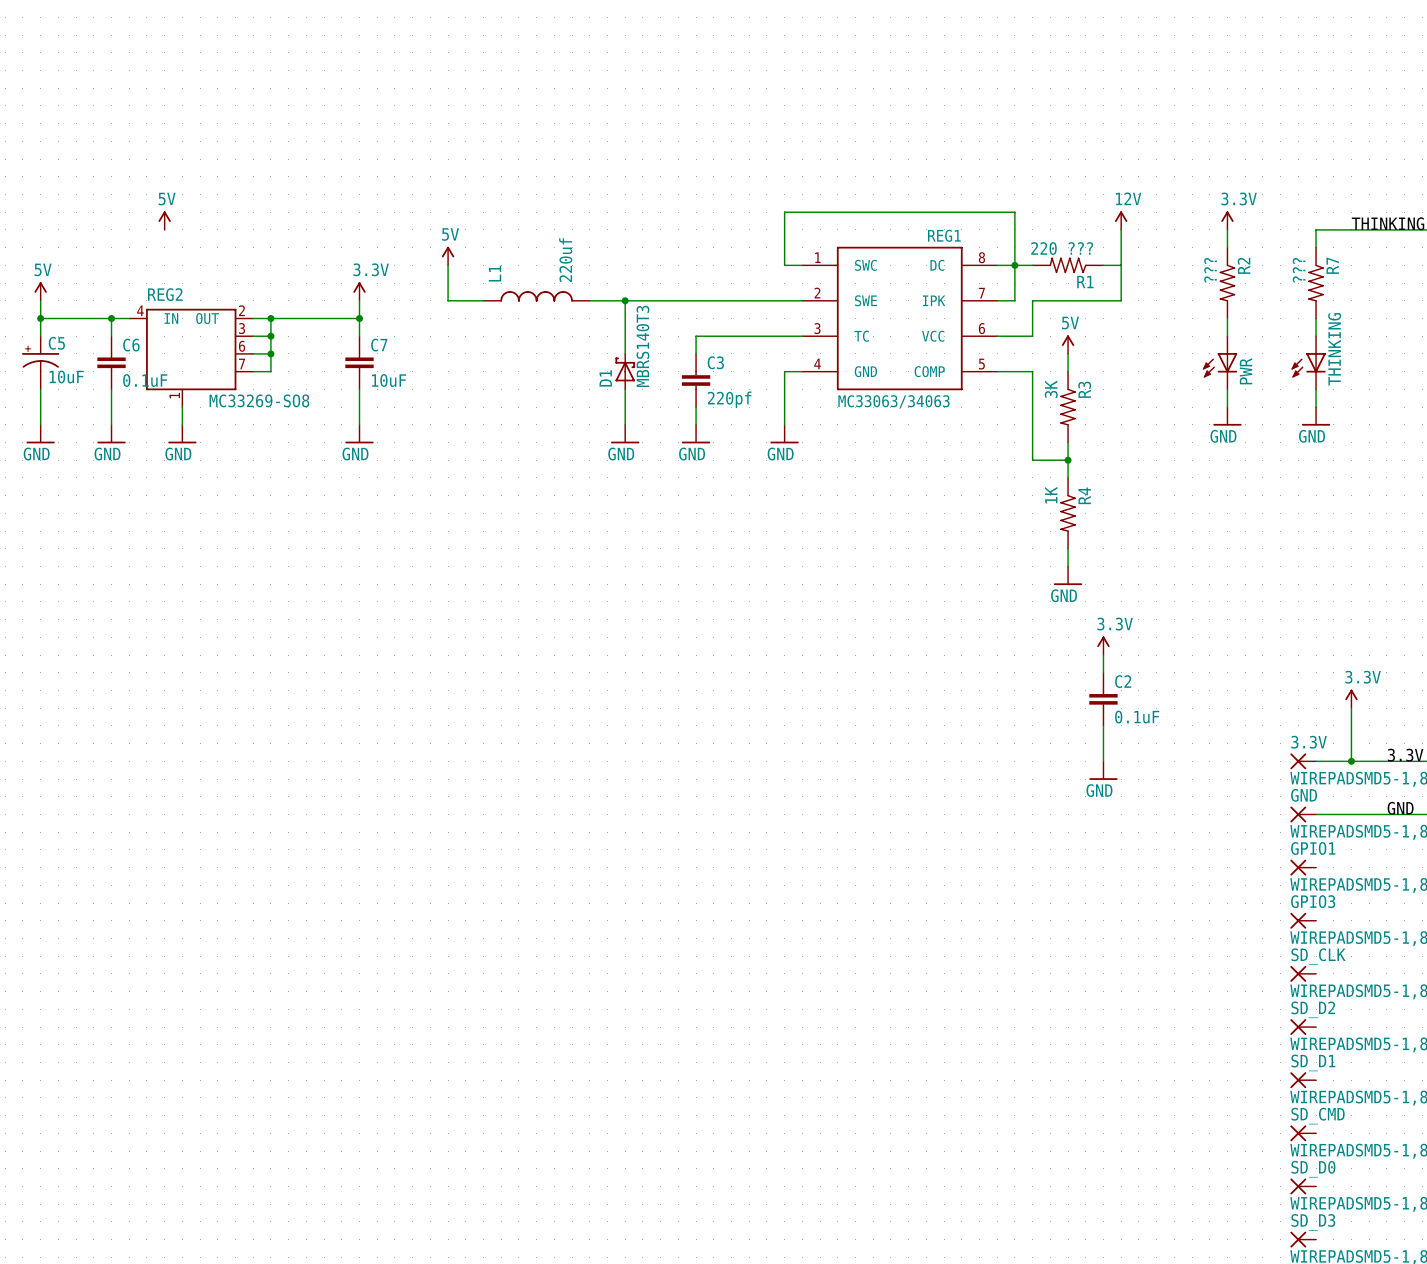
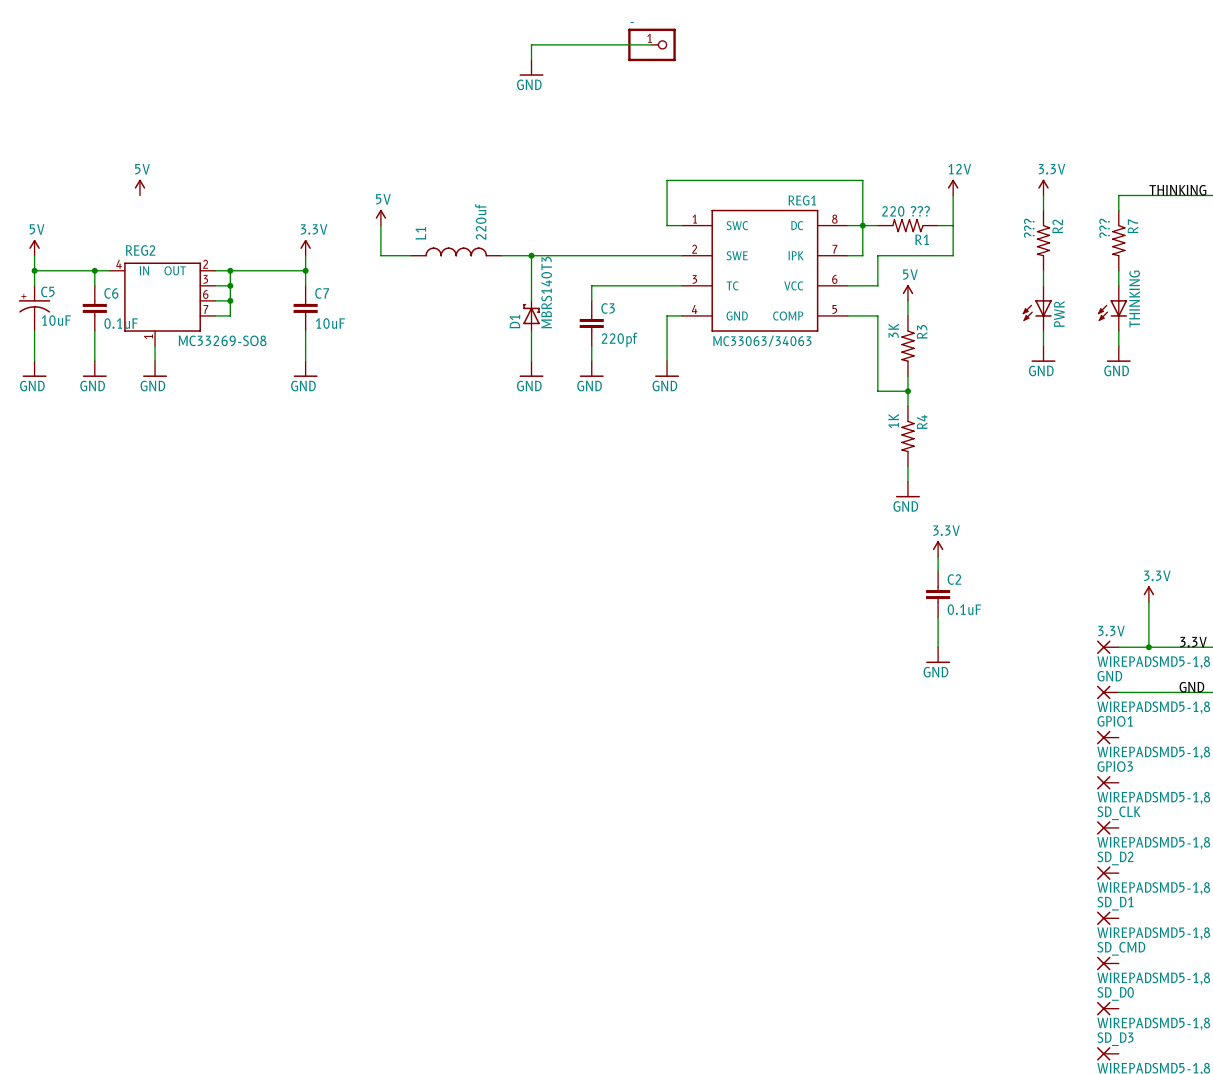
wire: none -> (651, 44) (531, 44) (531, 59)
part: none -> (651, 44)
power symbol: none -> GND (531, 67)

